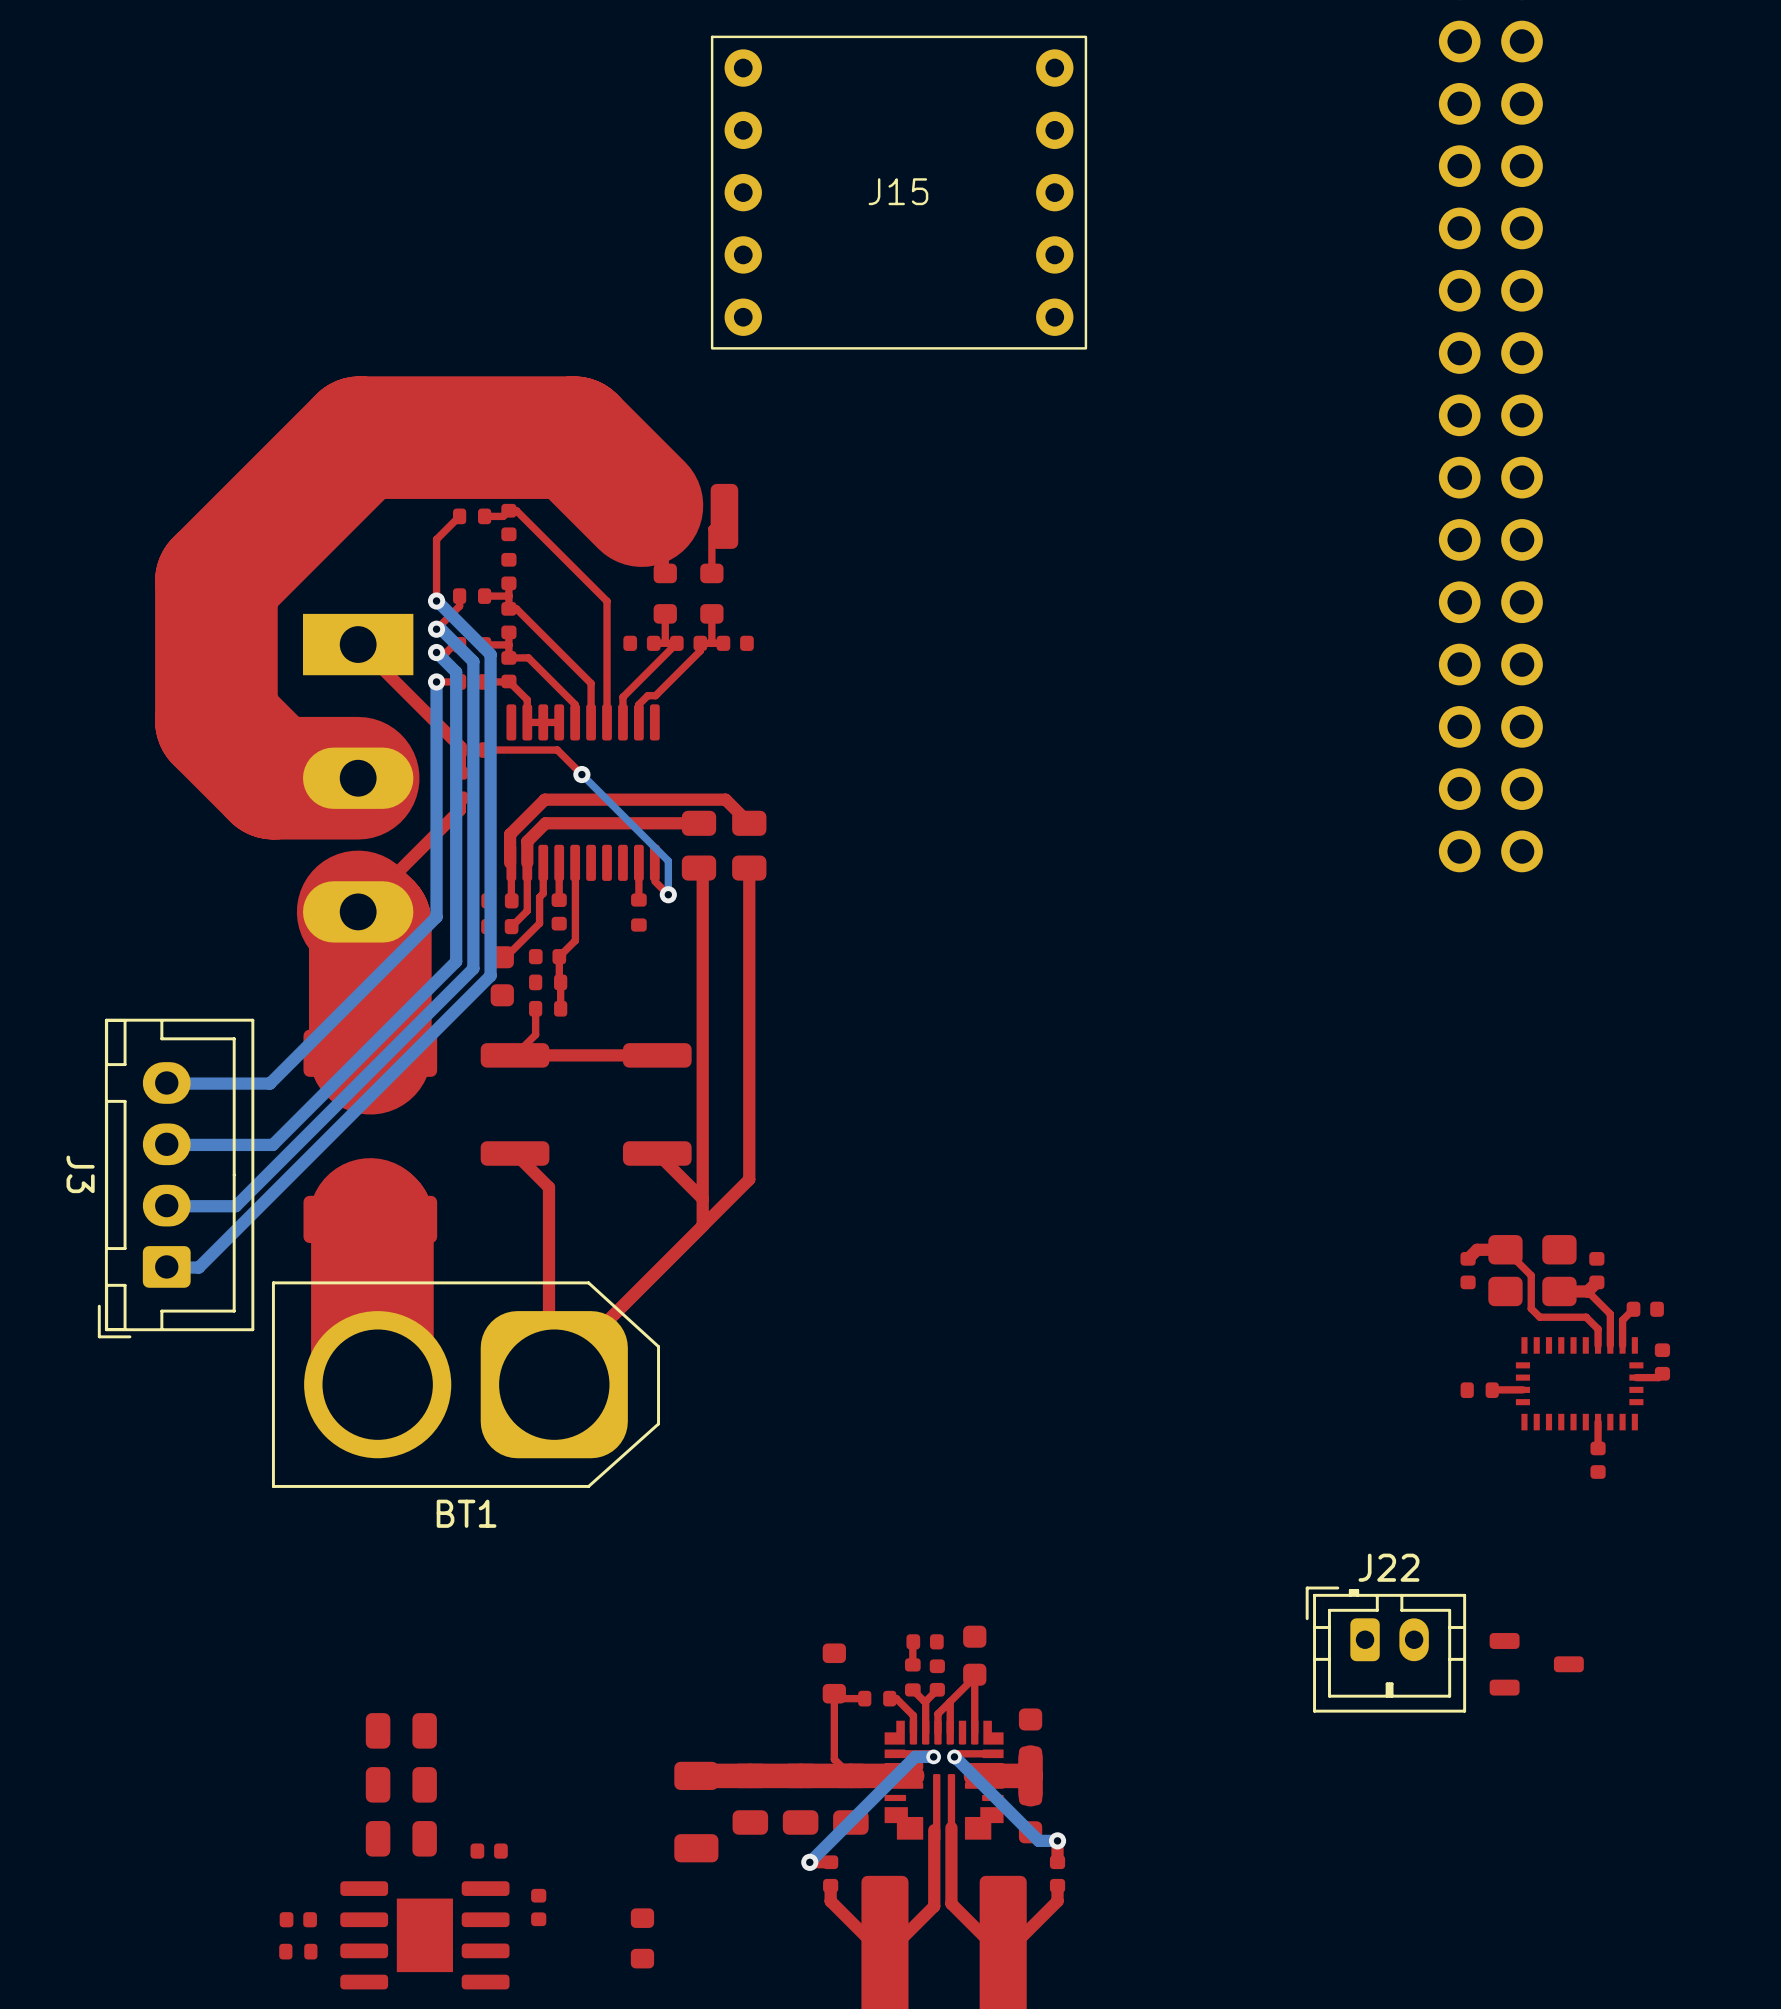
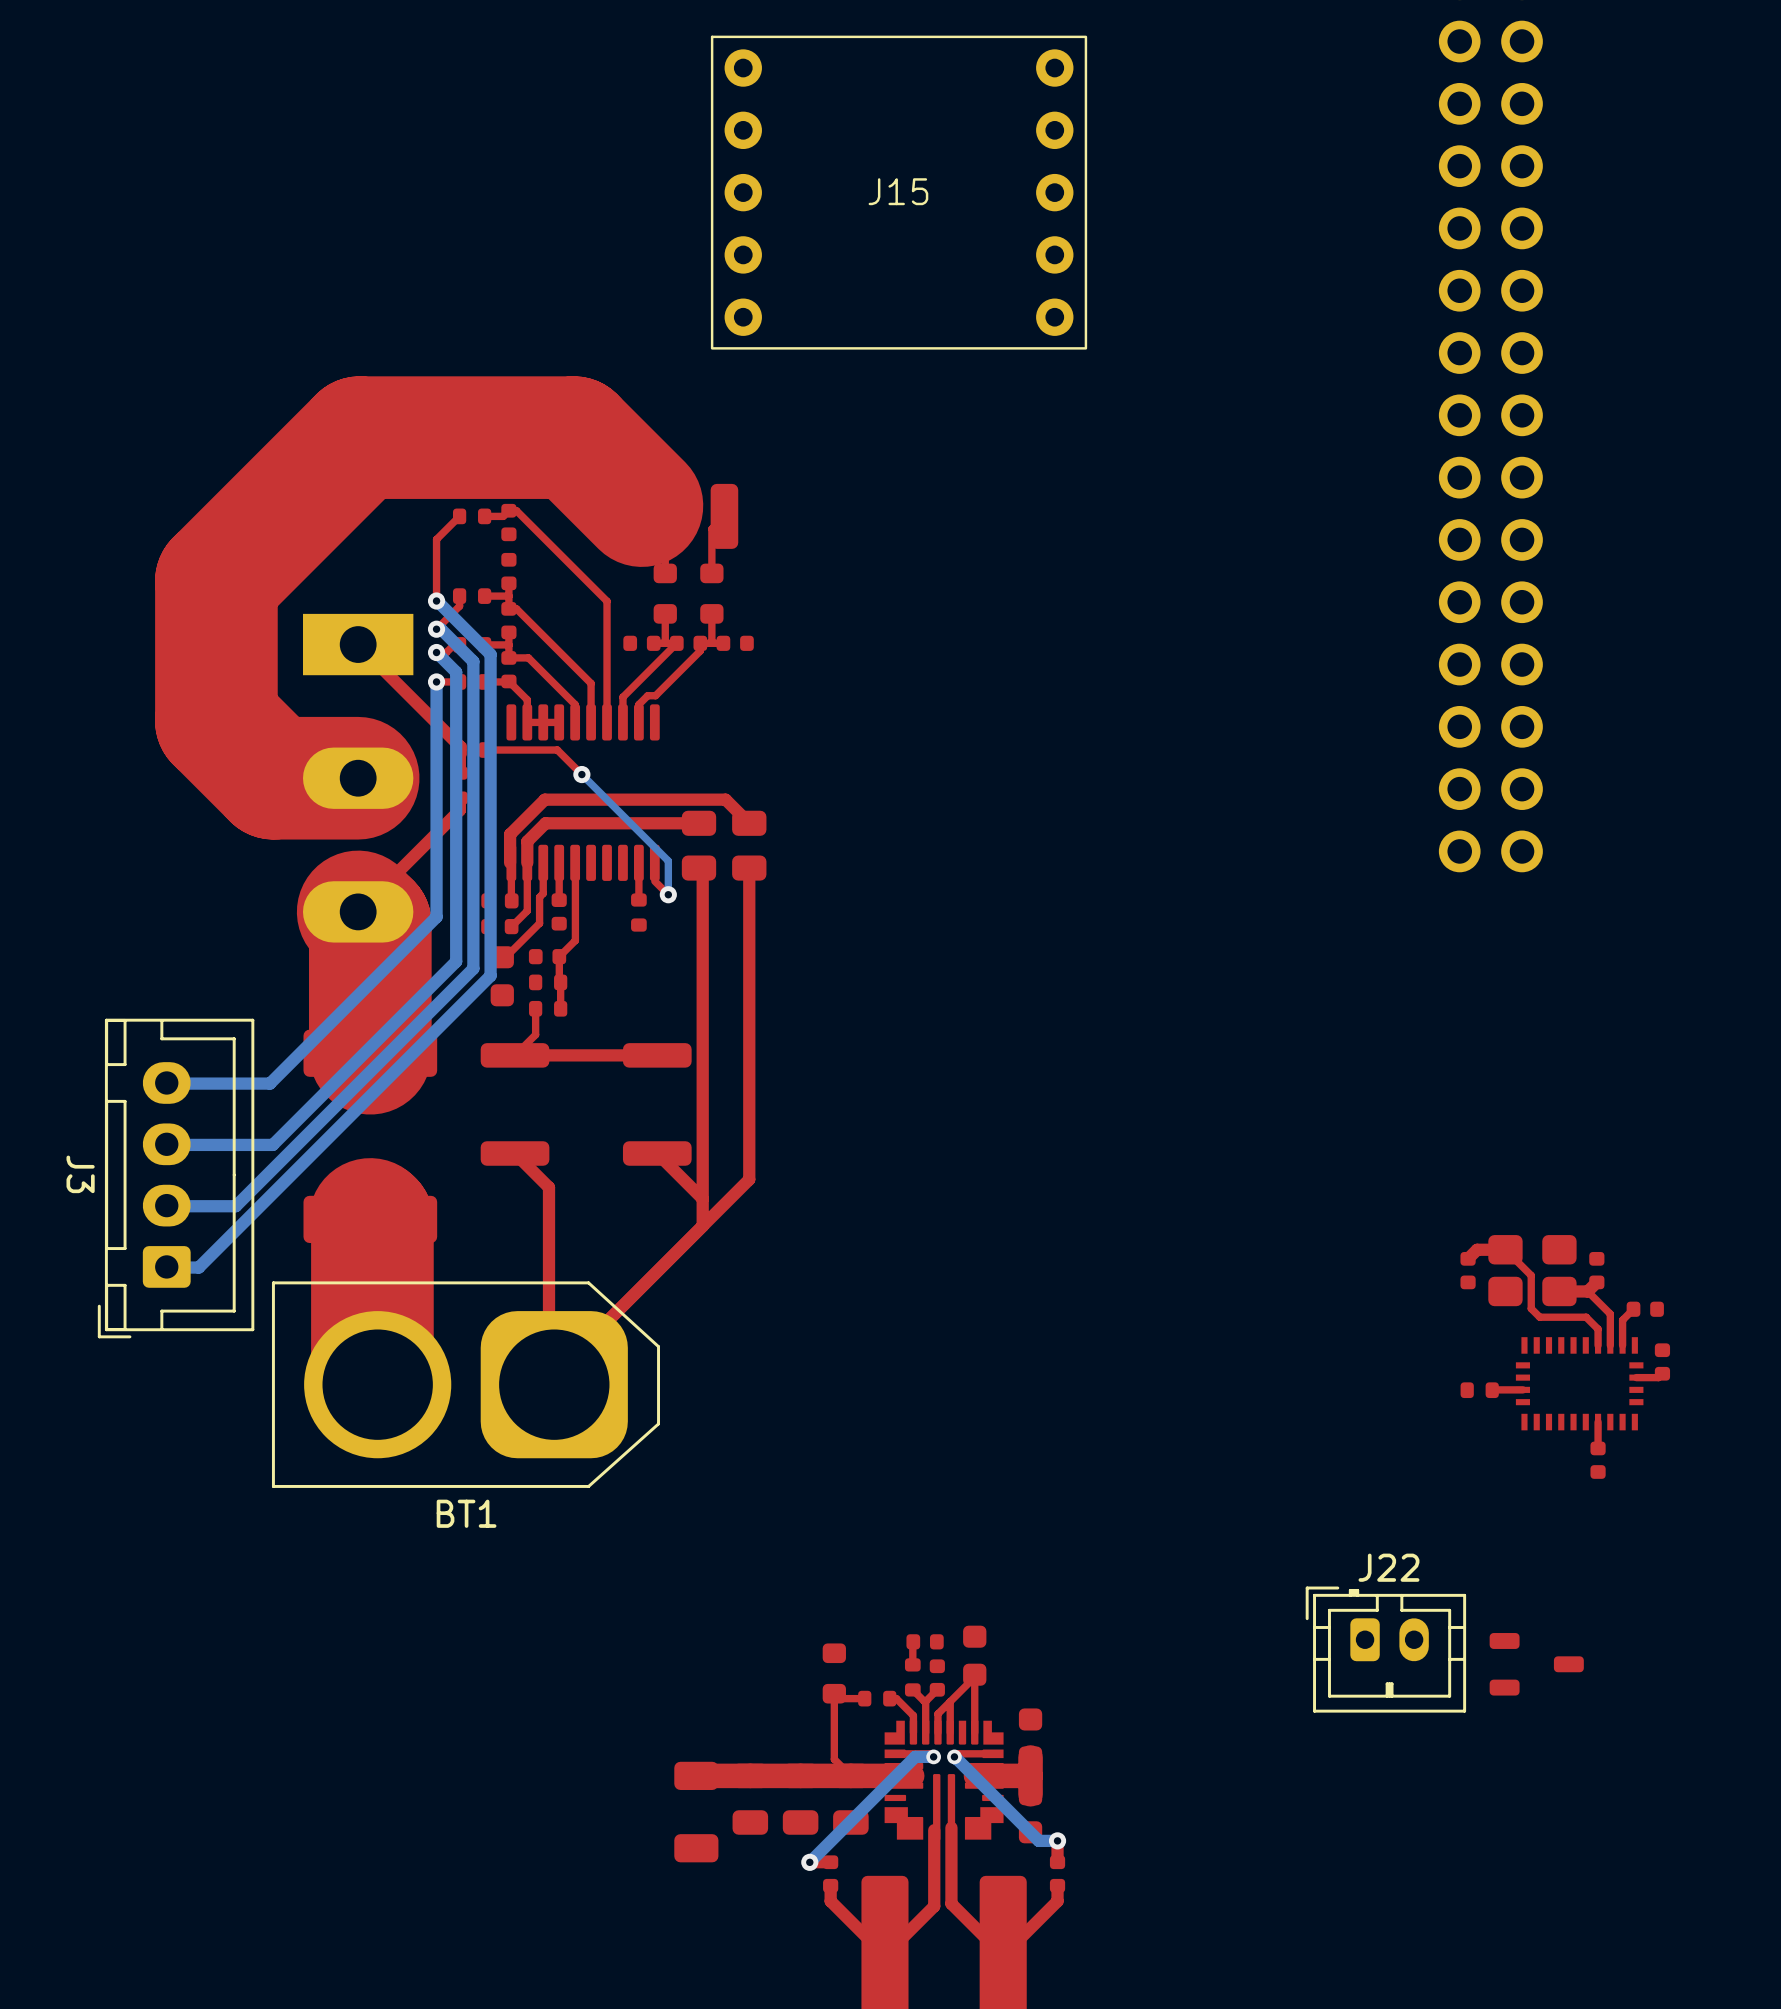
part: (401, 1730) -> none
part: (401, 1784) -> none
part: (401, 1838) -> none
part: (489, 1851) -> none
part: (538, 1907) -> none
part: (298, 1919) -> none
part: (424, 1935) -> none
part: (642, 1938) -> none
part: (298, 1951) -> none

